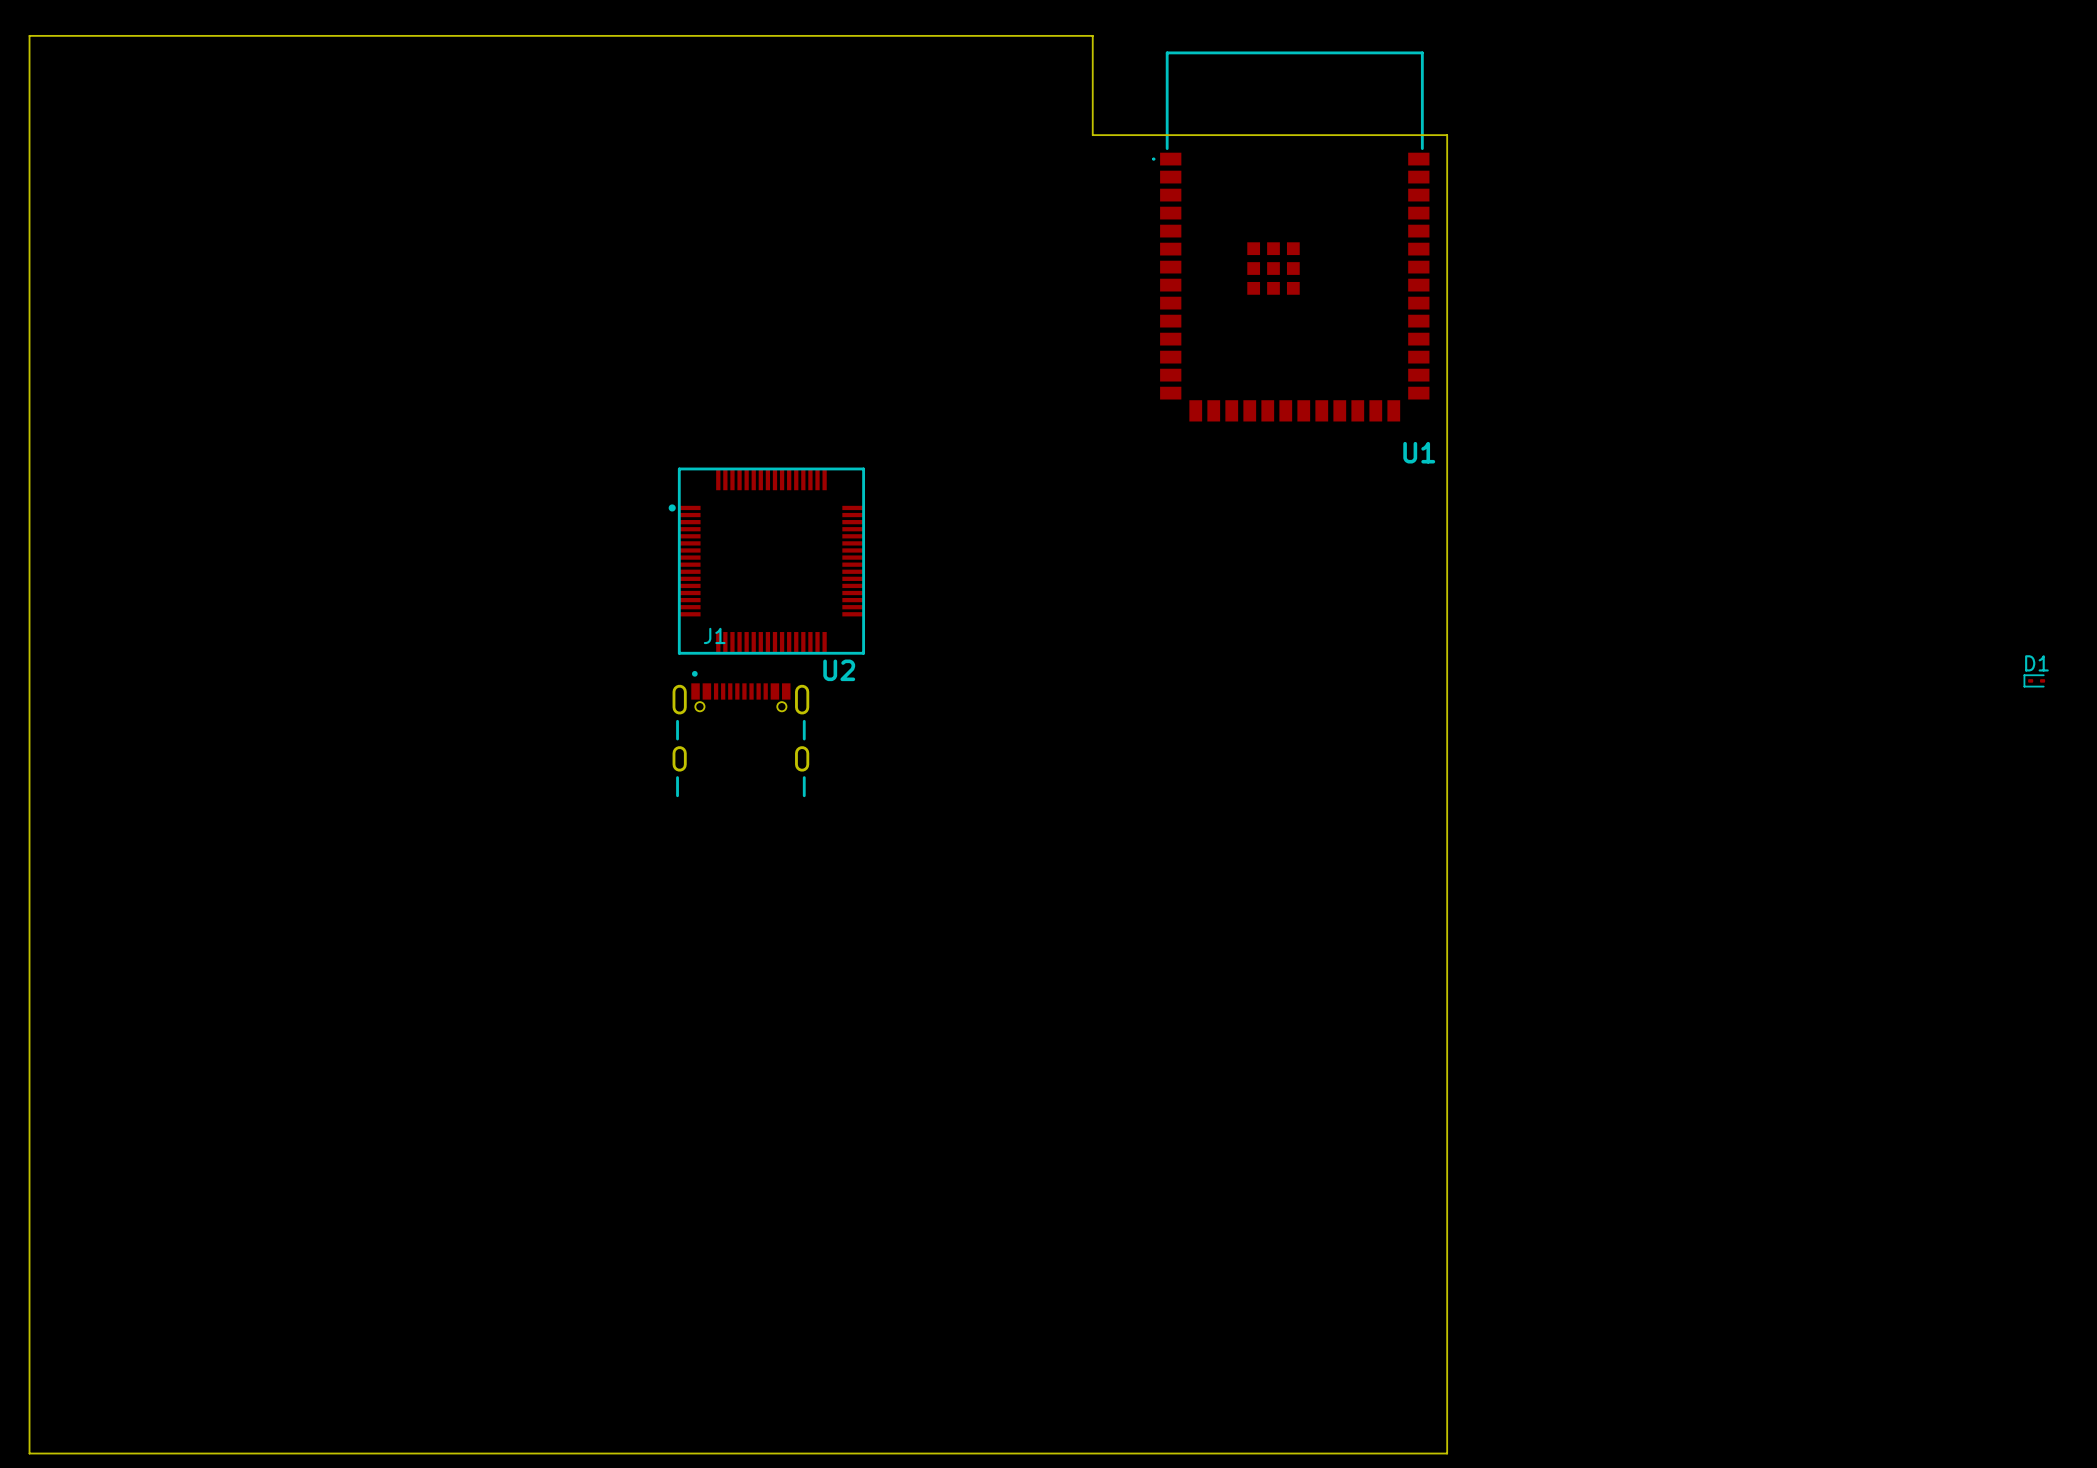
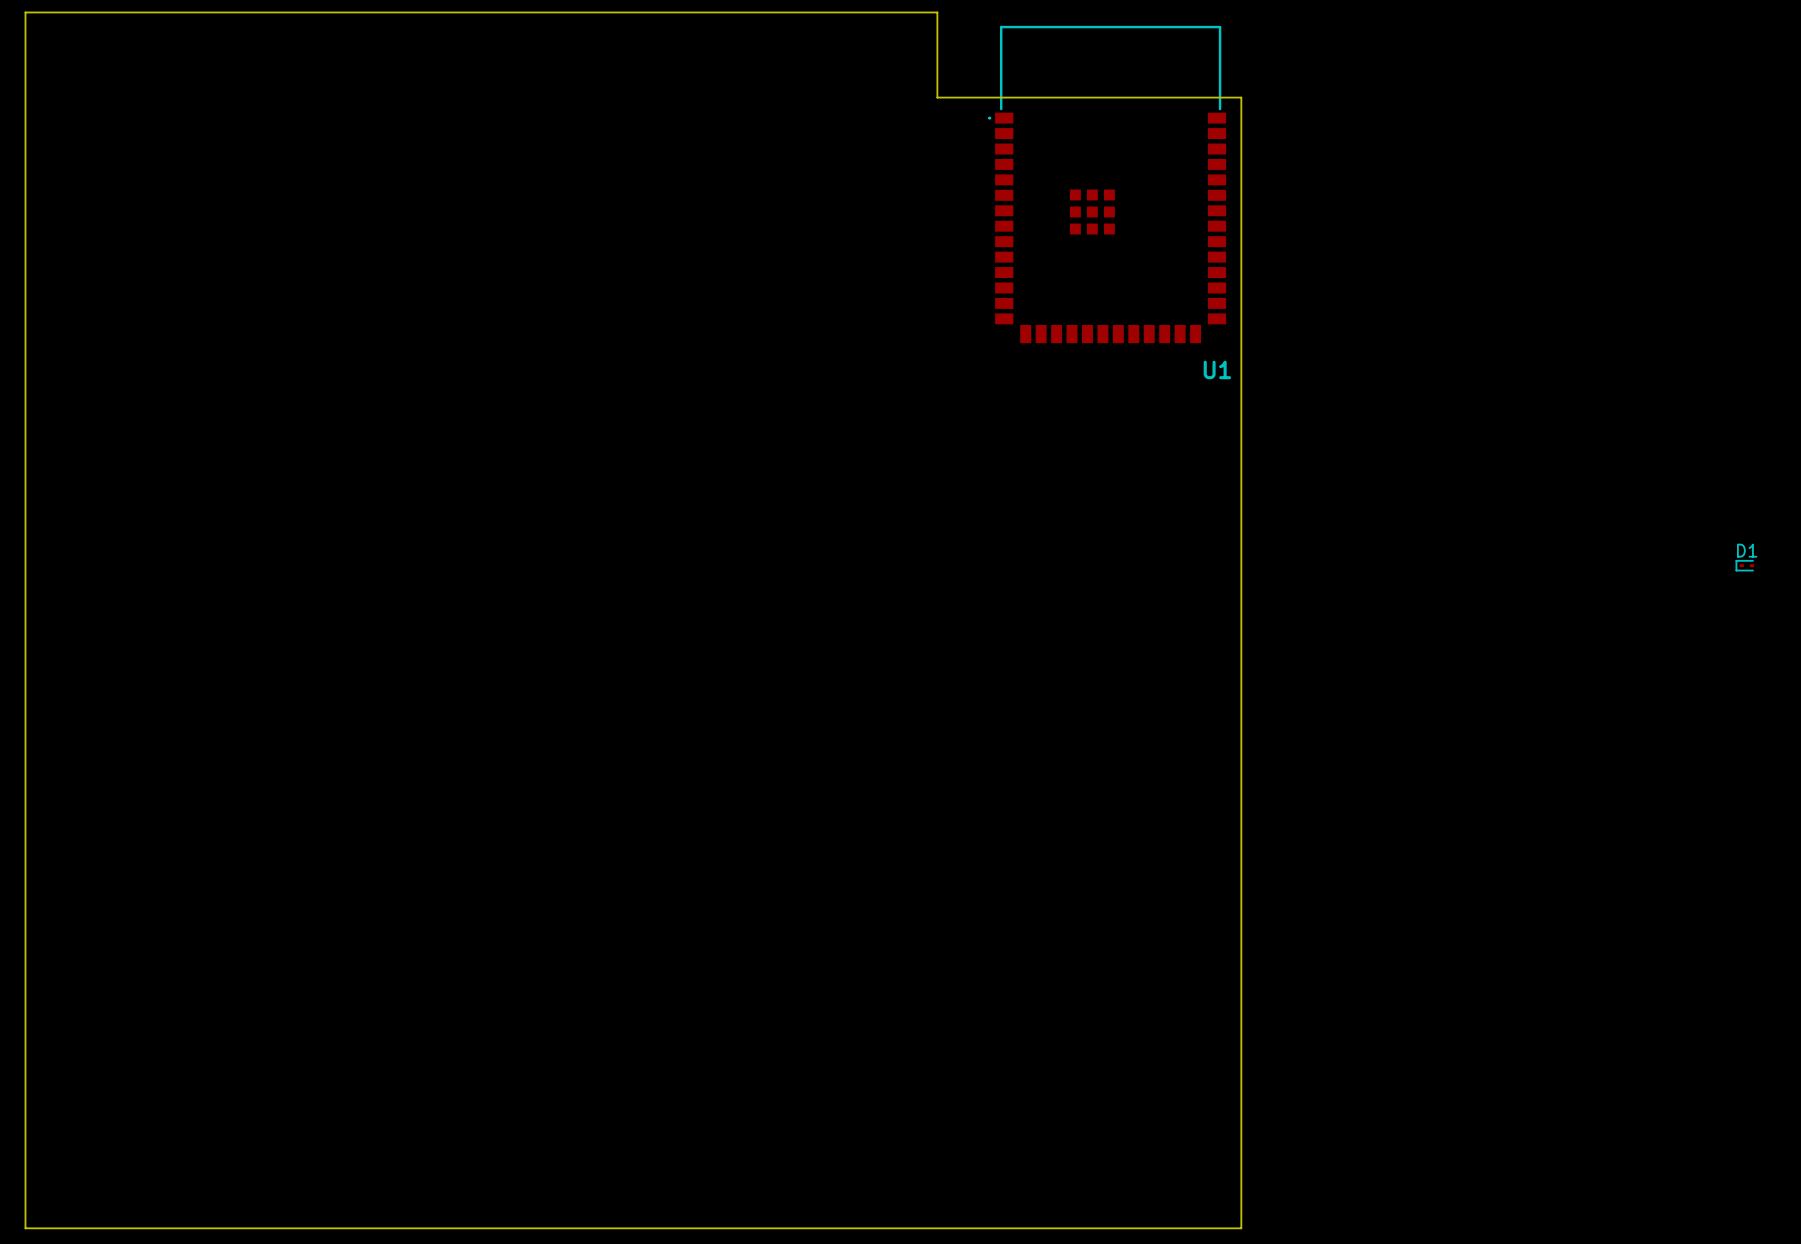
U2: (766, 561) -> none
J1: (740, 734) -> none

